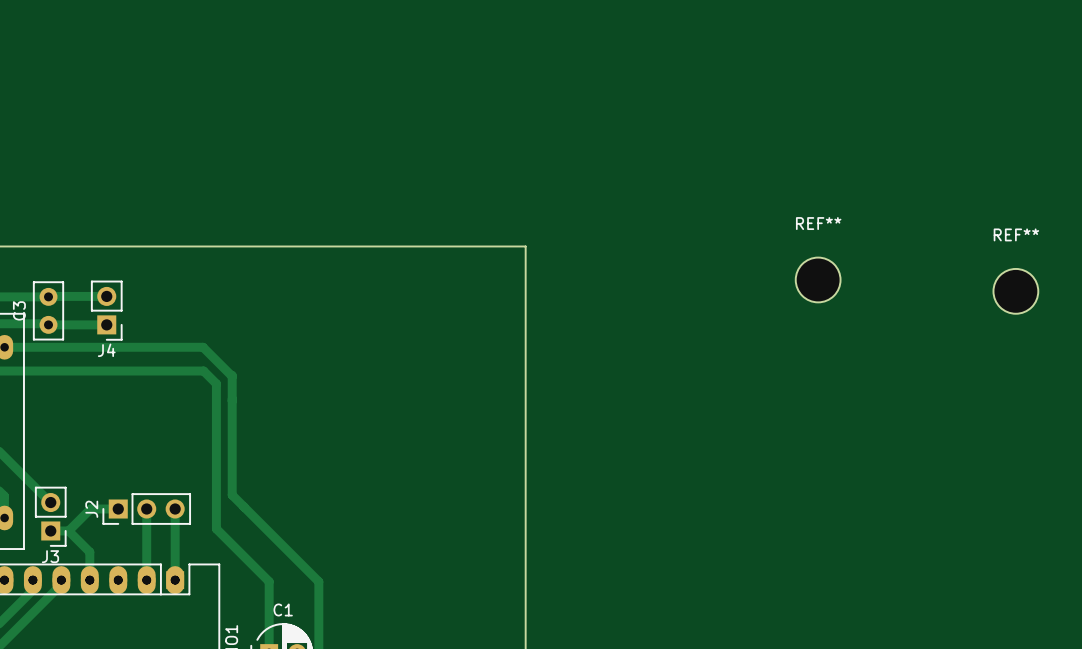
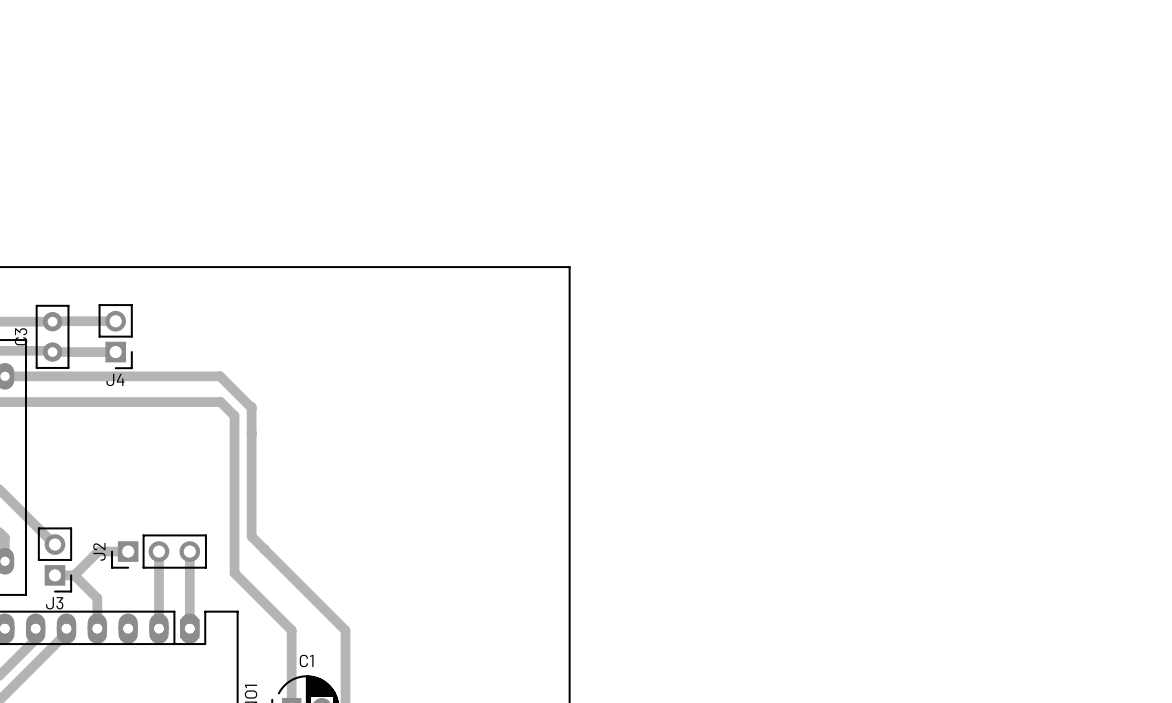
REF**: (818, 279) -> none
REF**: (1015, 291) -> none

